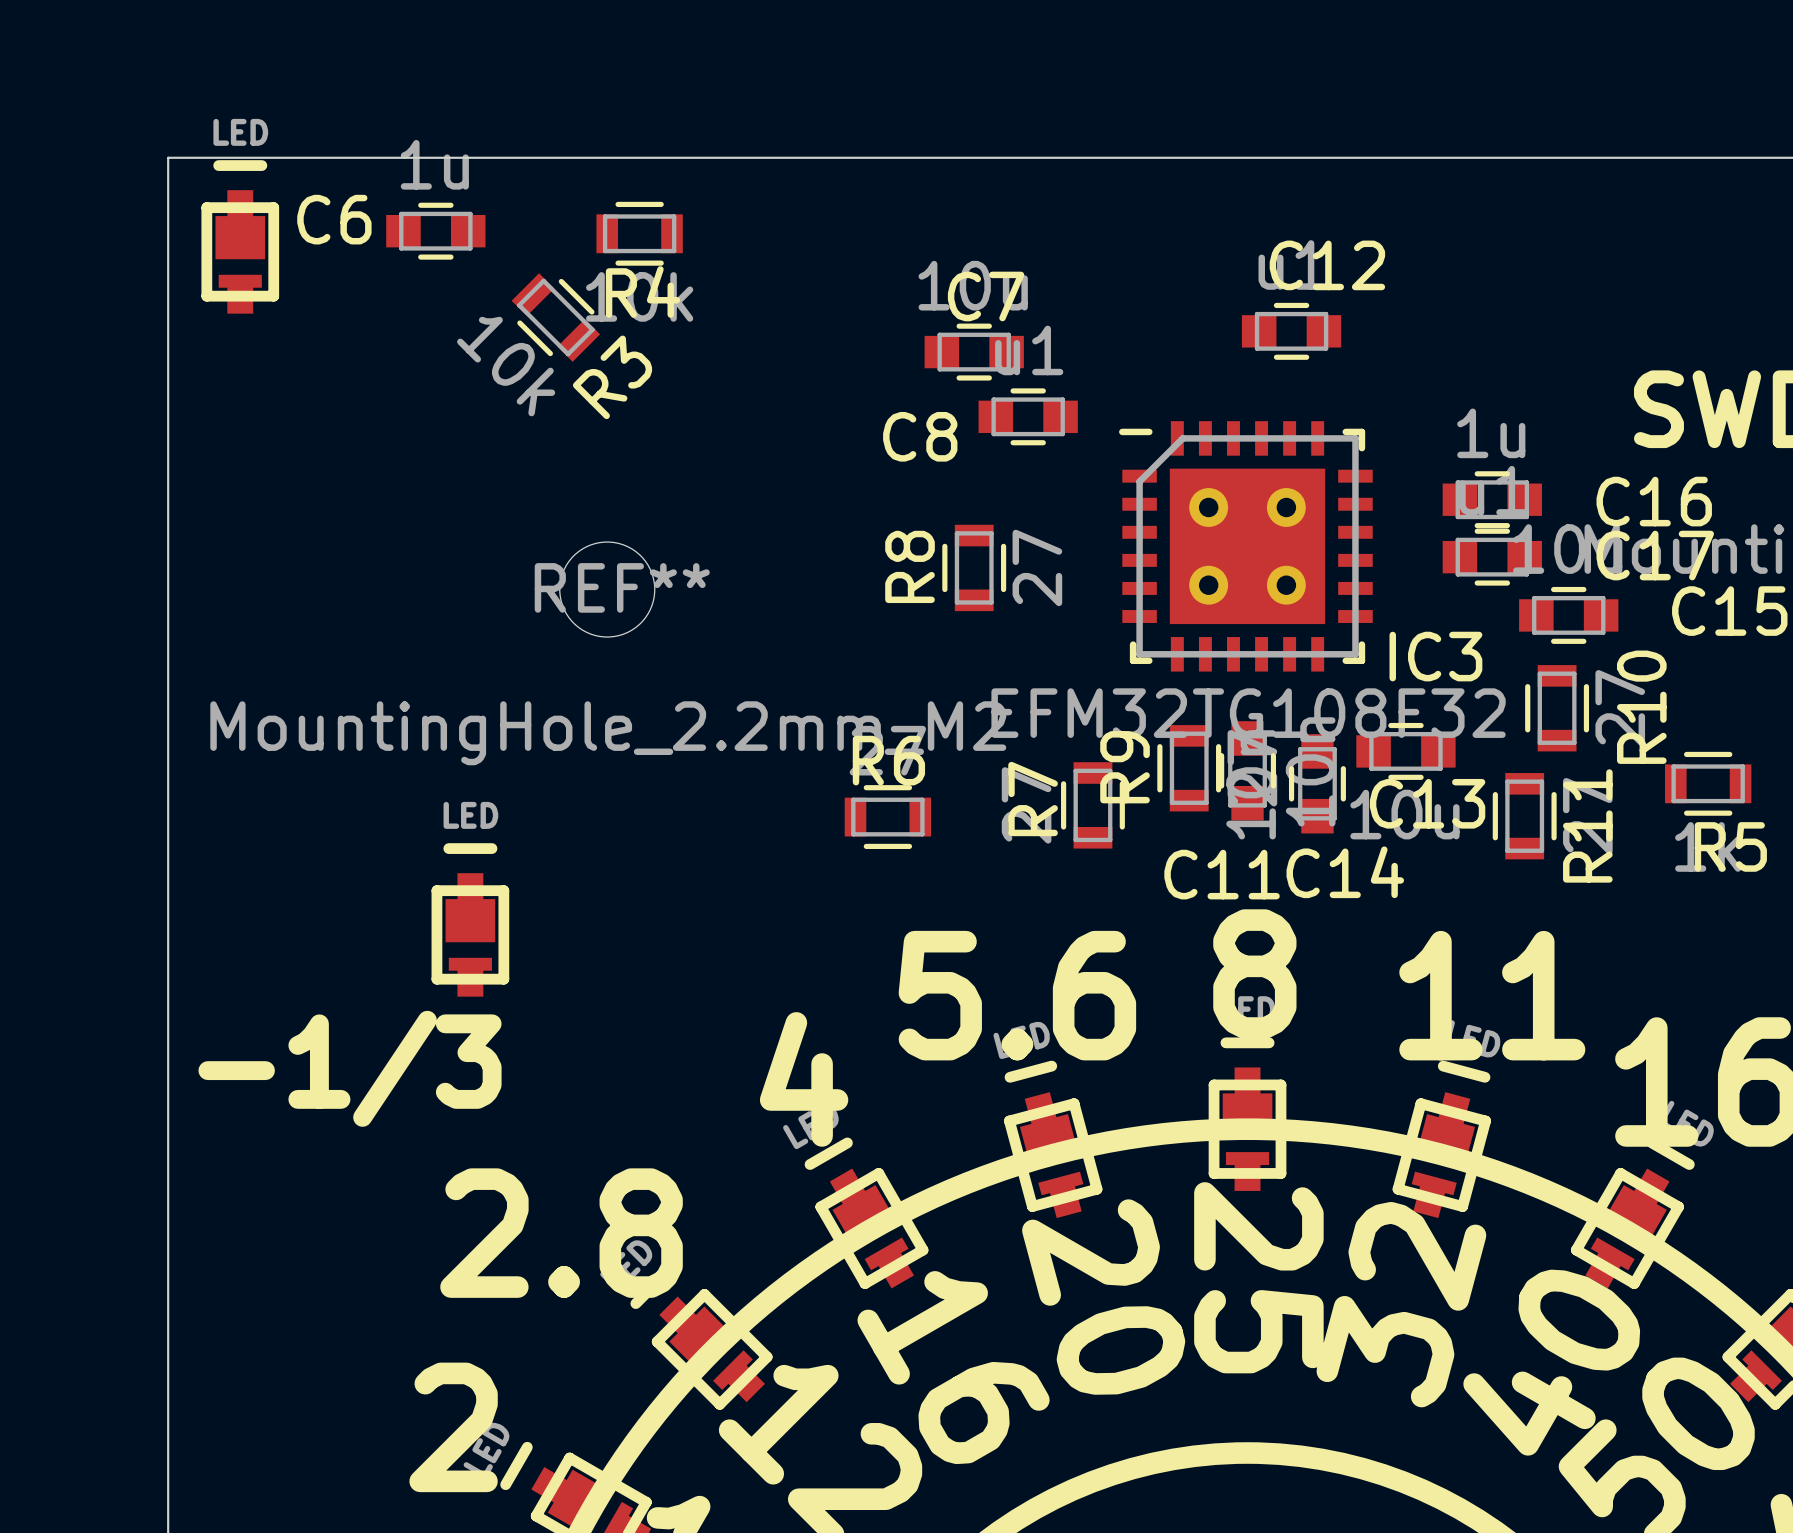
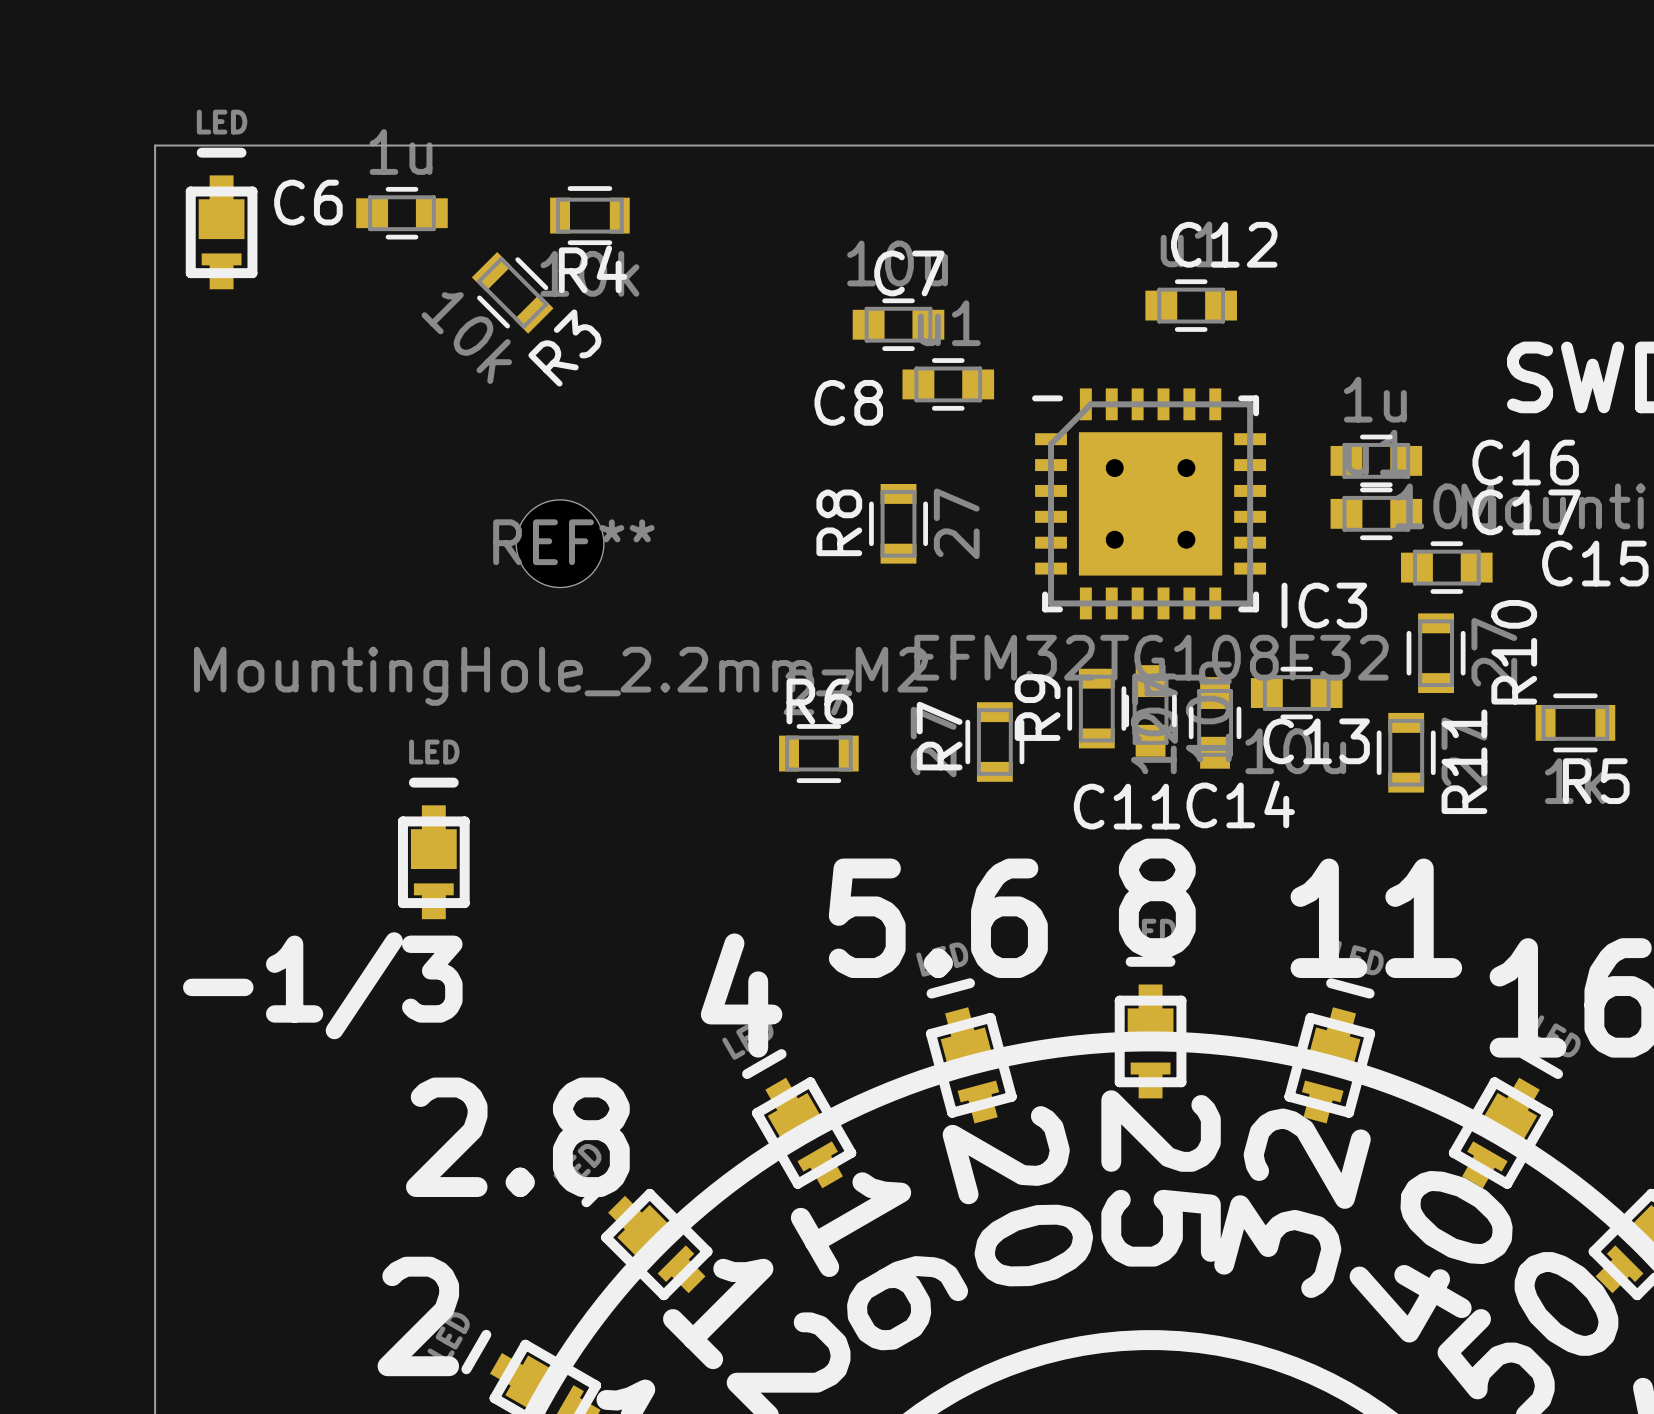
R7 position: (1092, 805) -> (994, 742)

